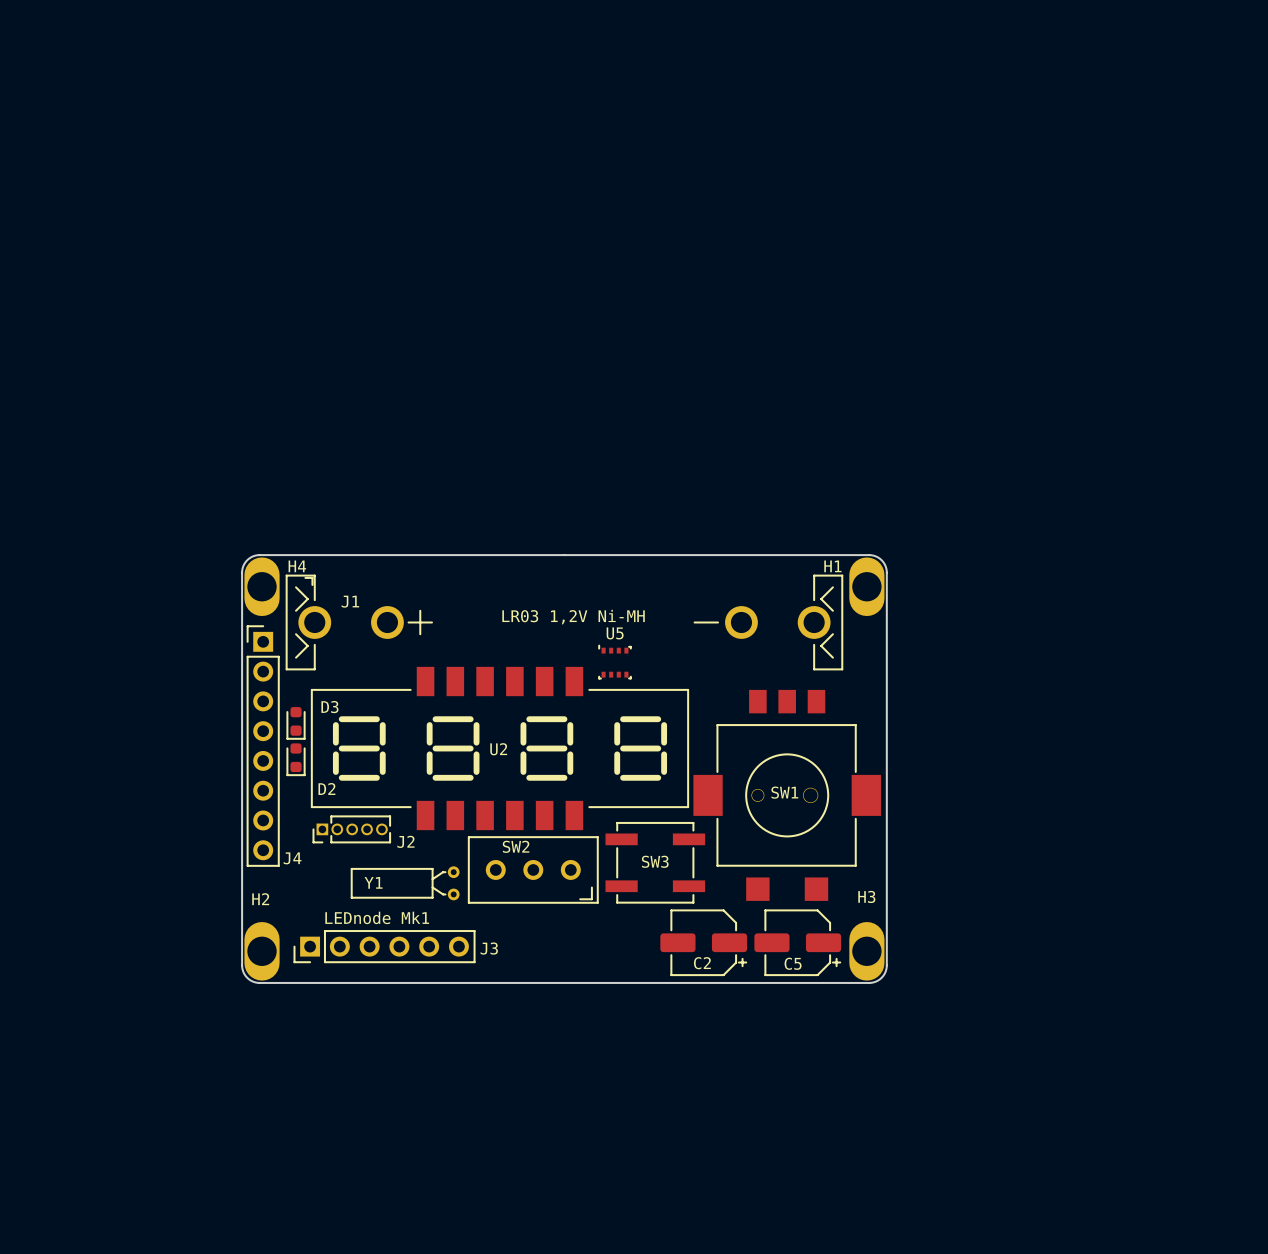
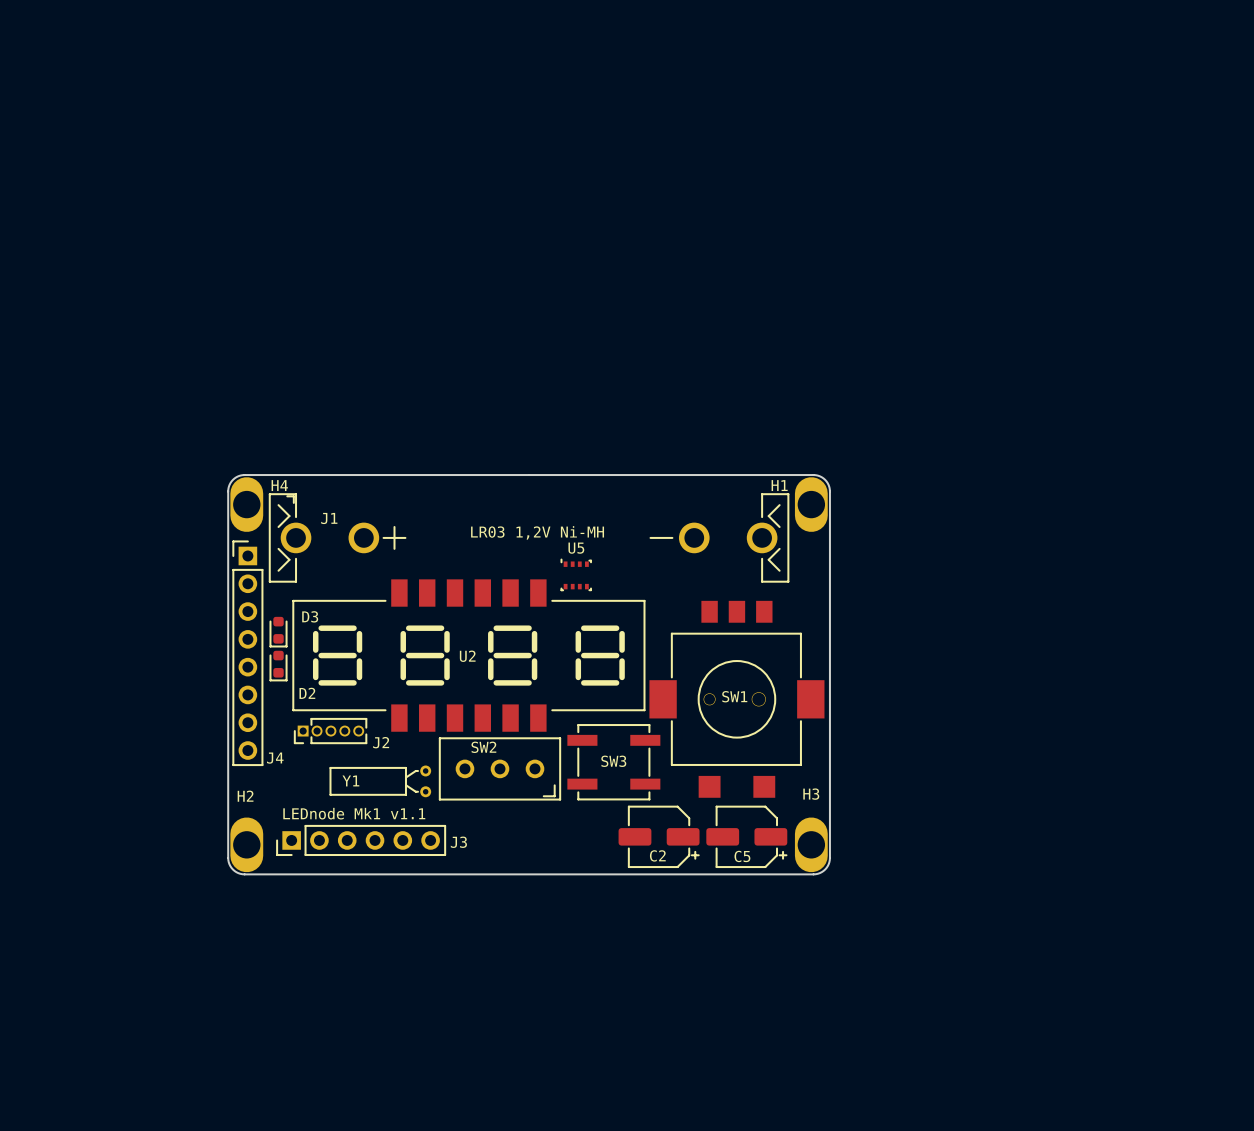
text: LEDnode Mk1 (377, 917) -> LEDnode Mk1 v1.1 (354, 813)

